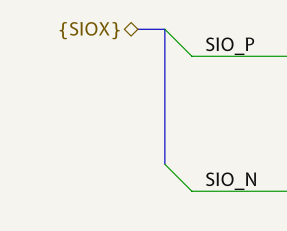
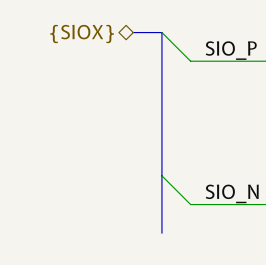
bus: none -> (161, 175) (161, 233)

